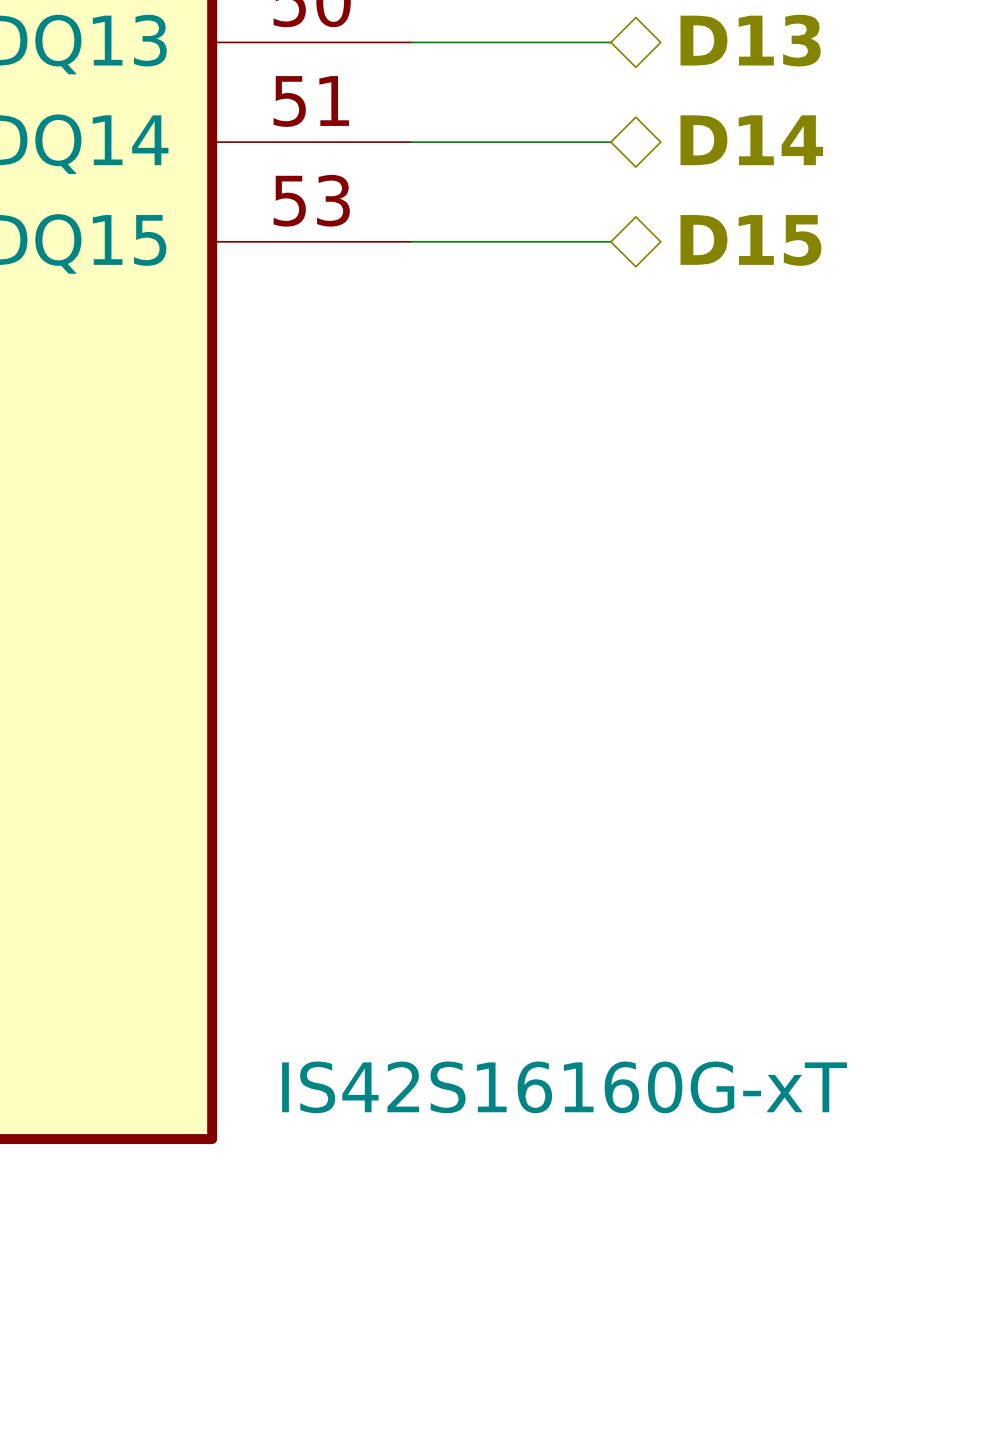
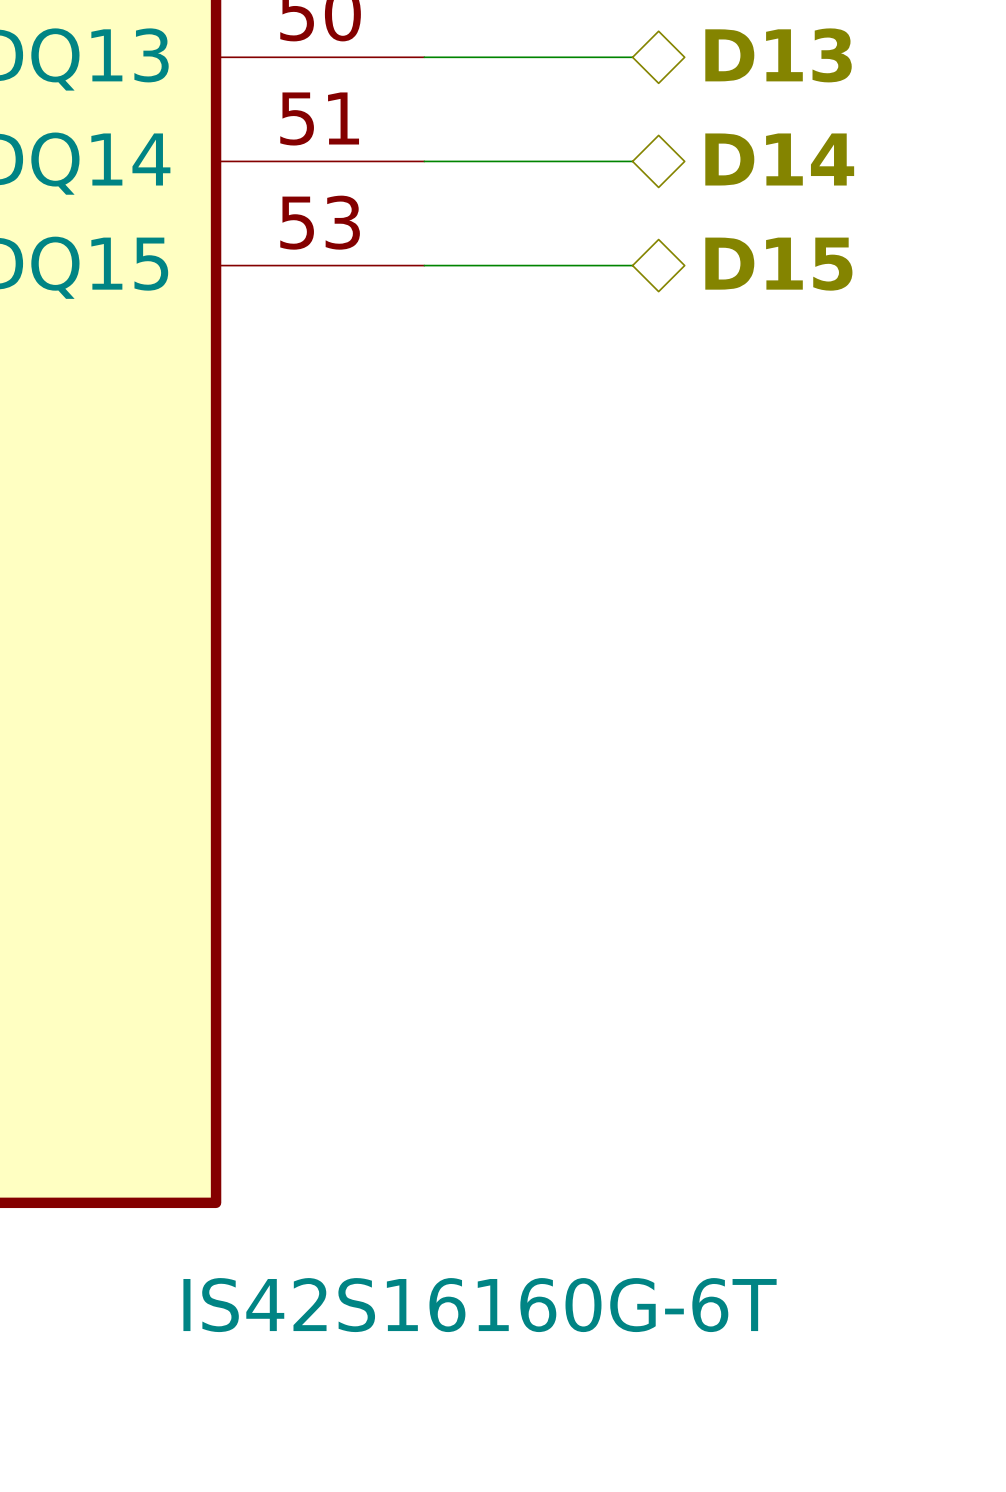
part value: IS42S16160G-xT (564, 1087) -> IS42S16160G-6T (480, 1305)

